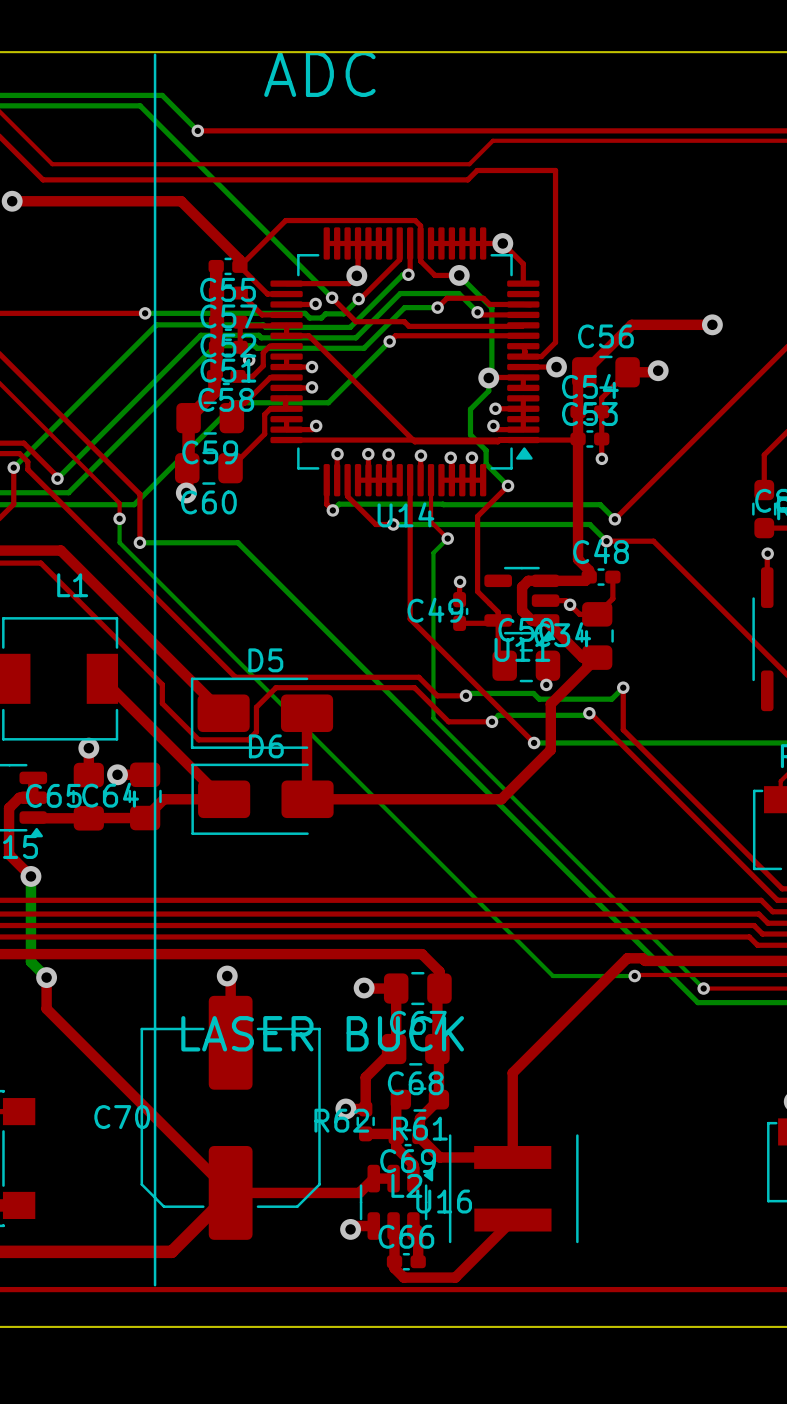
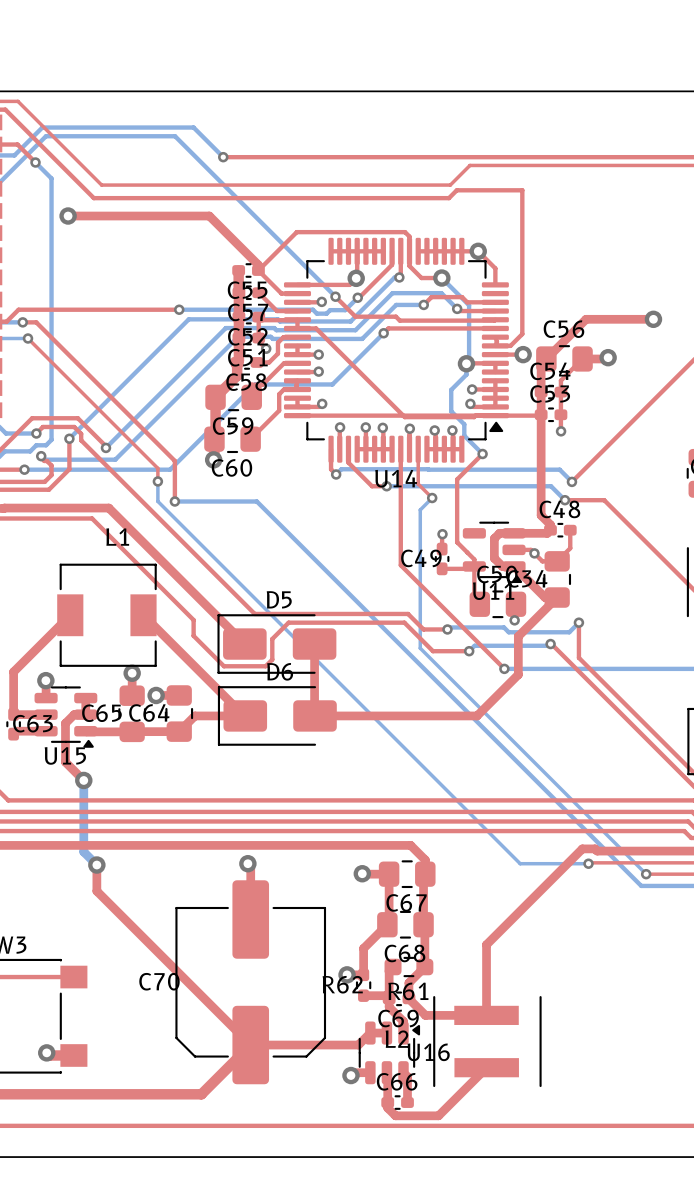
line: (155, 54) (155, 1285) -> none
text: ADC (319, 74) -> none
text: LASER BUCK (322, 1033) -> none

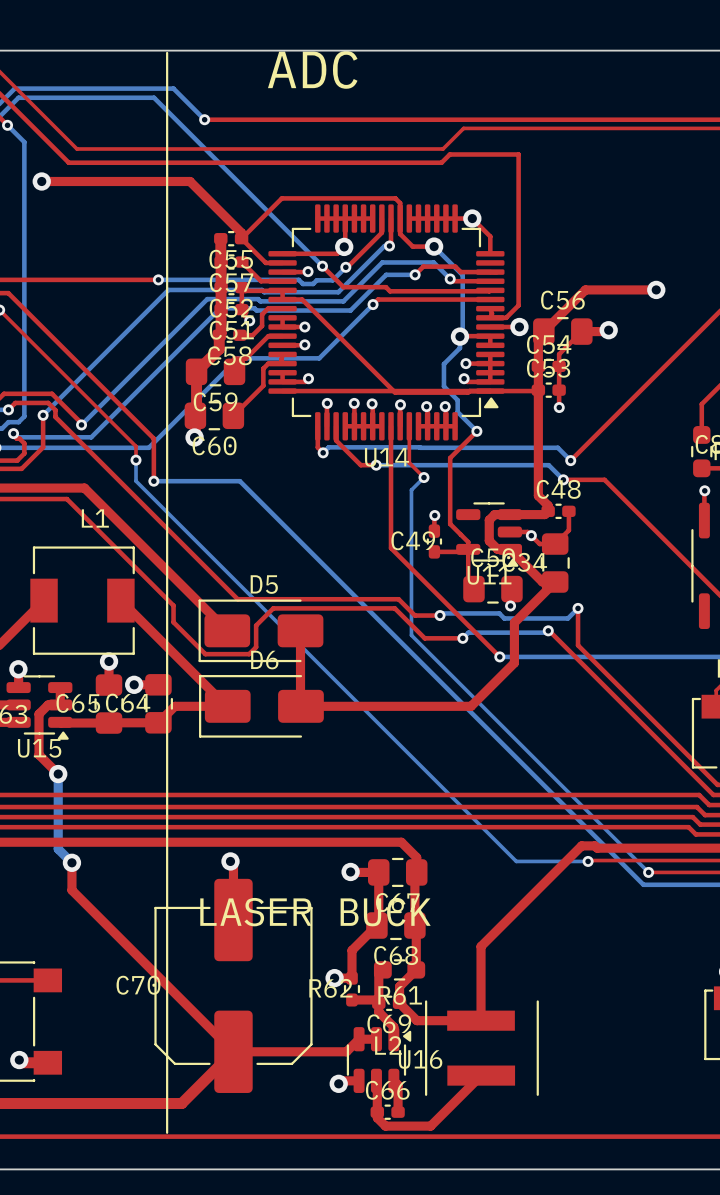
line: none -> (167, 52) (167, 1132)
text: none -> ADC (312, 69)
text: none -> LASER BUCK (315, 912)

